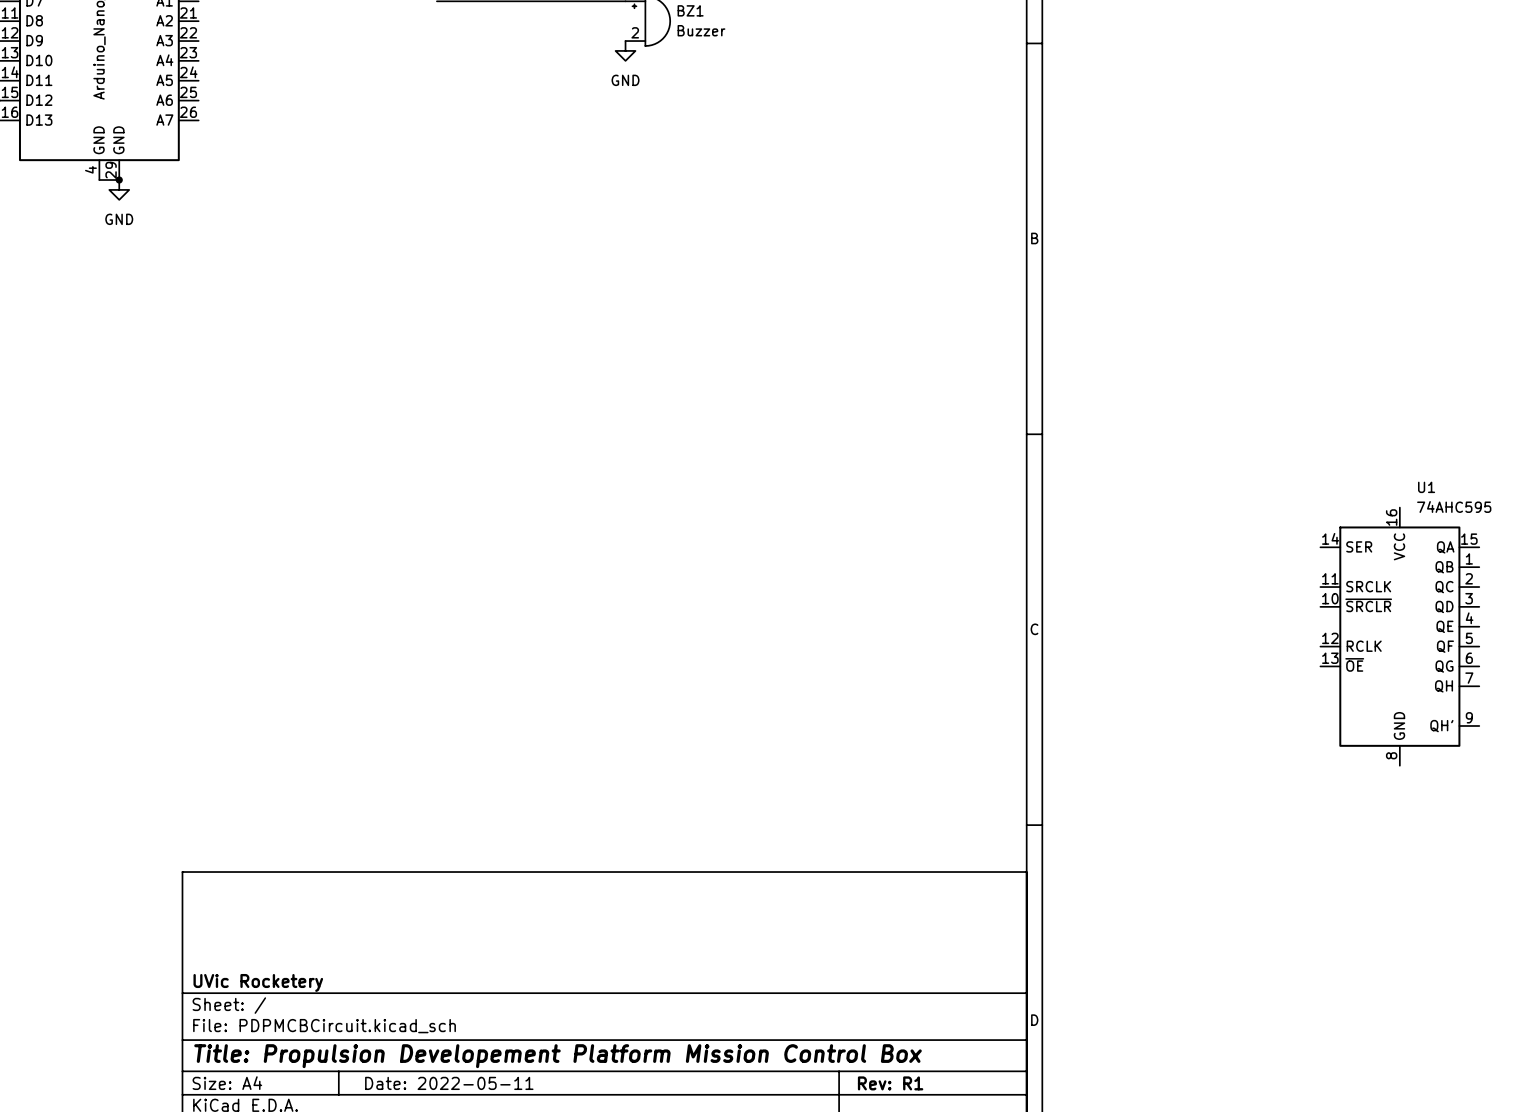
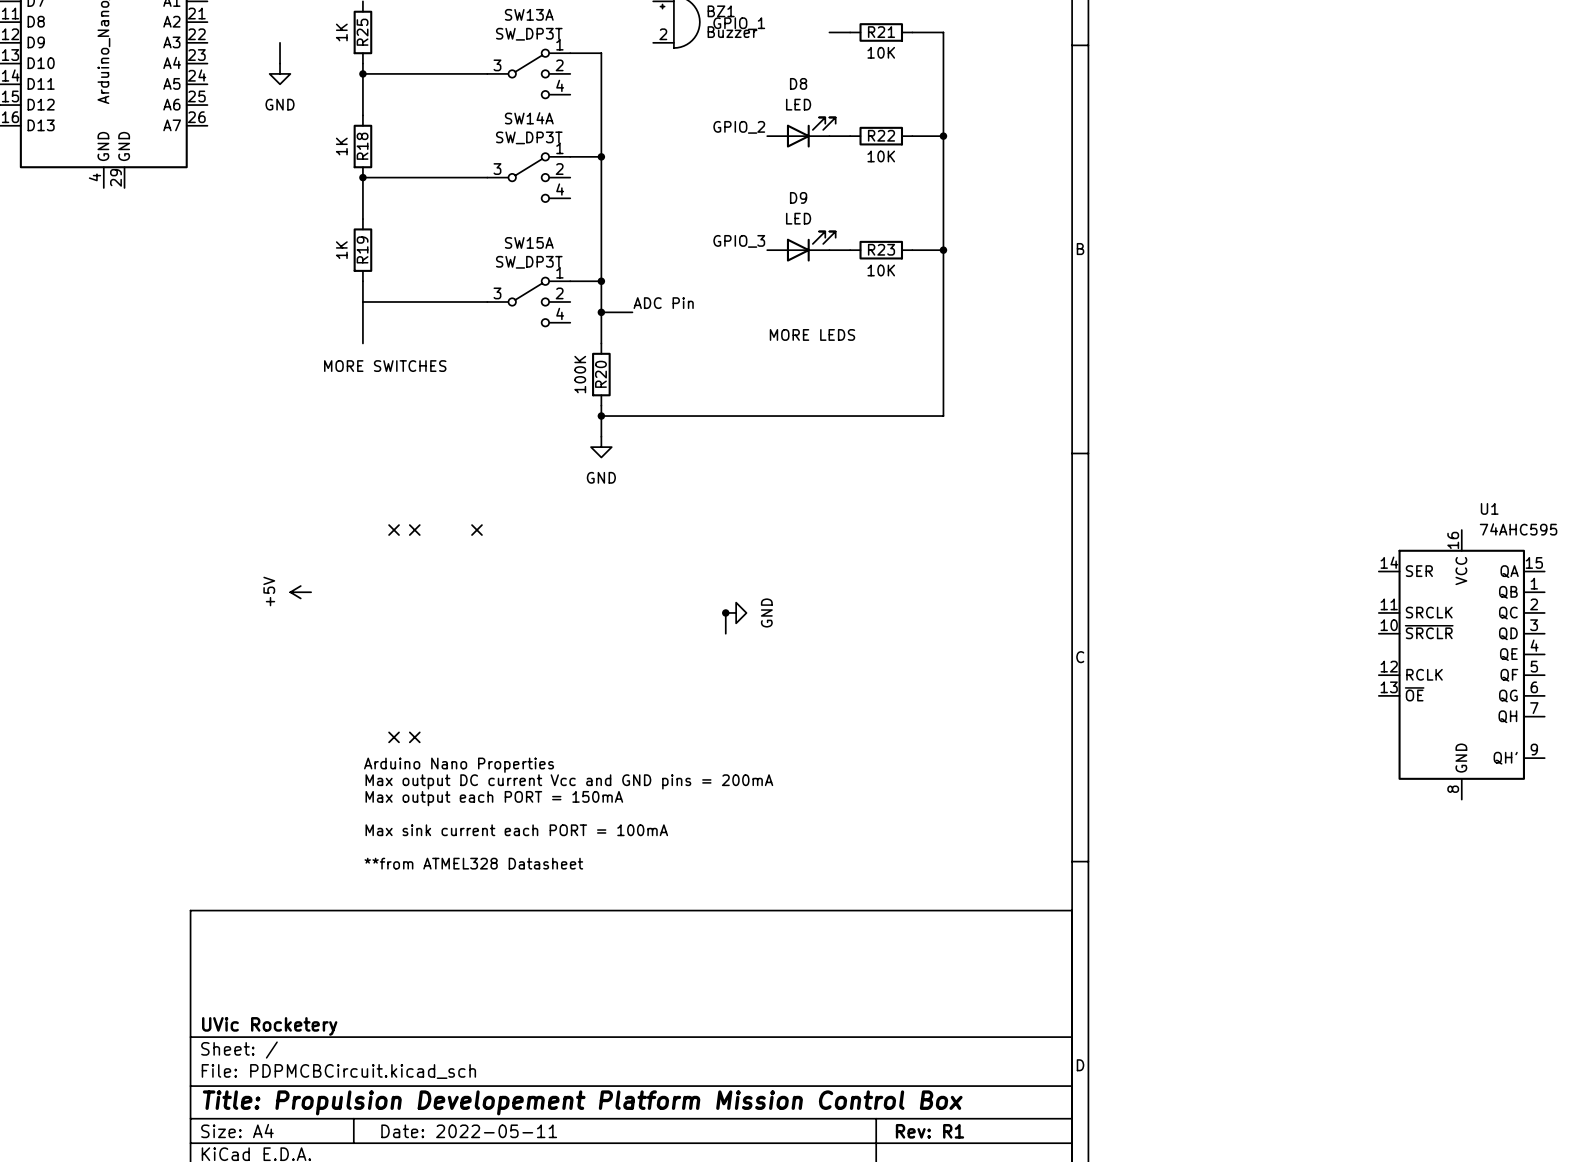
wire: (436, 1) (625, 1) -> none
label: none -> GPIO_1 (739, 23)
R25: none -> 1K (362, 32)
wire: none -> (829, 32) (850, 32)
R21: none -> 10K (881, 32)
wire: none -> (912, 32) (943, 32) (943, 416) (601, 416)
wire: none -> (280, 42) (280, 63)
wire: none -> (570, 53) (601, 53) (601, 343)
power symbol: GND (625, 50) -> none
wire: none -> (362, 63) (362, 115)
power symbol: none -> GND (280, 73)
wire: none -> (362, 73) (487, 73)
junction: none -> (362, 73)
SW13A: none -> SW_DP3T (528, 73)
label: none -> GPIO_2 (739, 127)
D8: none -> LED (801, 132)
wire: none -> (829, 136) (850, 136)
R22: none -> 10K (881, 136)
wire: none -> (912, 136) (943, 136)
junction: none -> (943, 136)
R18: none -> 1K (362, 146)
wire: none -> (570, 156) (601, 156)
junction: none -> (601, 156)
junction: none -> (362, 177)
wire: none -> (487, 177) (362, 177) (362, 219)
SW14A: none -> SW_DP3T (528, 177)
wire: (99, 180) (119, 180) -> none
junction: (119, 180) -> none
power symbol: GND (119, 189) -> none
label: none -> GPIO_3 (739, 241)
D9: none -> LED (801, 246)
R19: none -> 1K (362, 250)
wire: none -> (829, 250) (850, 250)
R23: none -> 10K (881, 250)
wire: none -> (912, 250) (943, 250)
junction: none -> (943, 250)
wire: none -> (362, 281) (362, 343)
wire: none -> (570, 281) (601, 281)
junction: none -> (601, 281)
wire: none -> (362, 301) (487, 301)
SW15A: none -> SW_DP3T (528, 301)
label: none -> ADC Pin (663, 303)
wire: none -> (601, 312) (632, 312)
junction: none -> (601, 312)
text: none -> MORE LEDS (812, 334)
text: none -> MORE SWITCHES (385, 366)
R20: none -> 100K (601, 374)
wire: none -> (601, 405) (601, 436)
junction: none -> (601, 416)
power symbol: none -> GND (601, 447)
no-connect mark: none -> (394, 530)
no-connect mark: none -> (414, 530)
no-connect mark: none -> (476, 530)
power symbol: none -> +5V (300, 592)
wire: none -> (725, 612) (725, 633)
junction: none -> (725, 612)
power symbol: none -> GND (736, 612)
no-connect mark: none -> (394, 737)
no-connect mark: none -> (414, 737)
text: none -> Arduino Nano Properties (459, 765)
text: none -> Max output DC current Vcc and GND pins = 200mA (569, 781)
text: none -> Max output each PORT = 150mA (494, 798)
text: none -> Max sink current each PORT = 100mA (516, 830)
text: none -> **from ATMEL328 Datasheet (473, 863)

